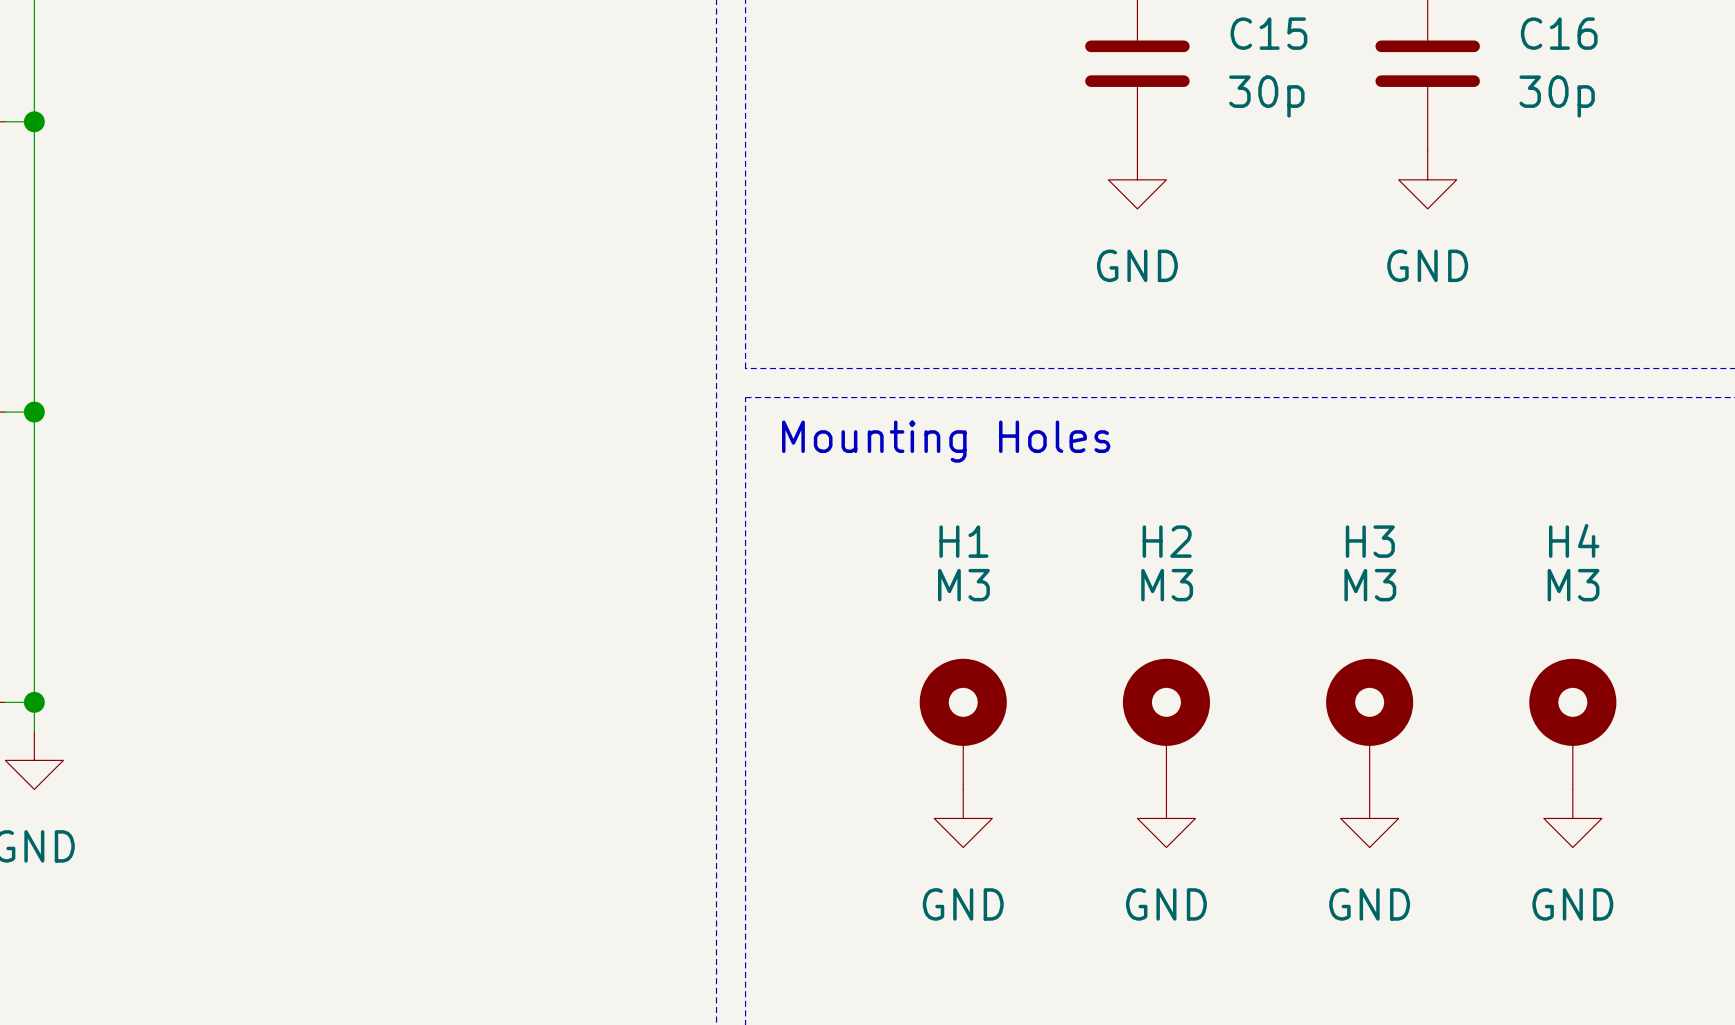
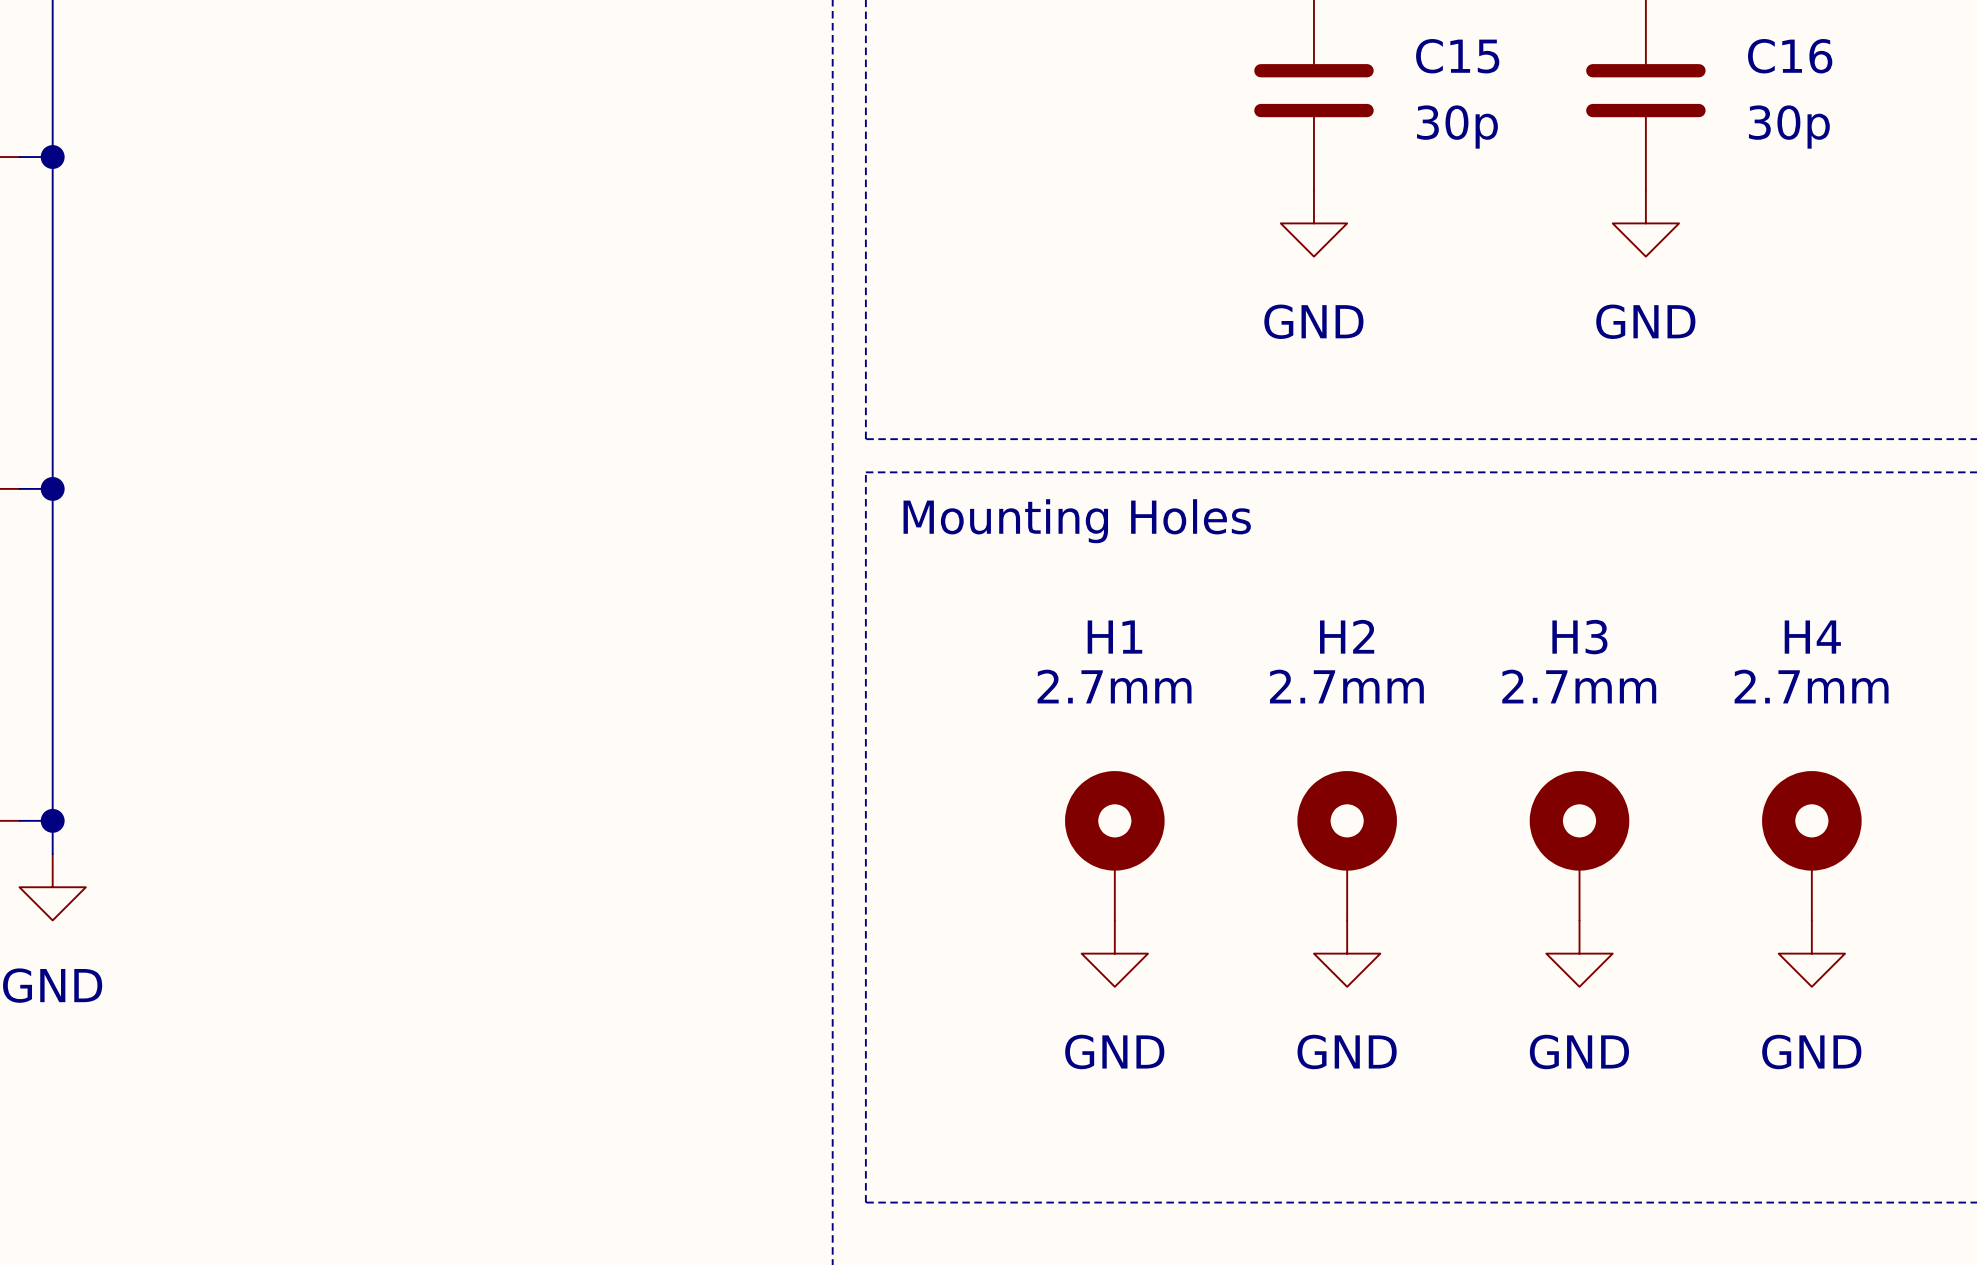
H1 value: M3 (963, 585) -> 2.7mm (1114, 686)
H2 value: M3 (1167, 585) -> 2.7mm (1346, 686)
H3 value: M3 (1370, 585) -> 2.7mm (1579, 686)
H4 value: M3 (1573, 585) -> 2.7mm (1811, 686)

